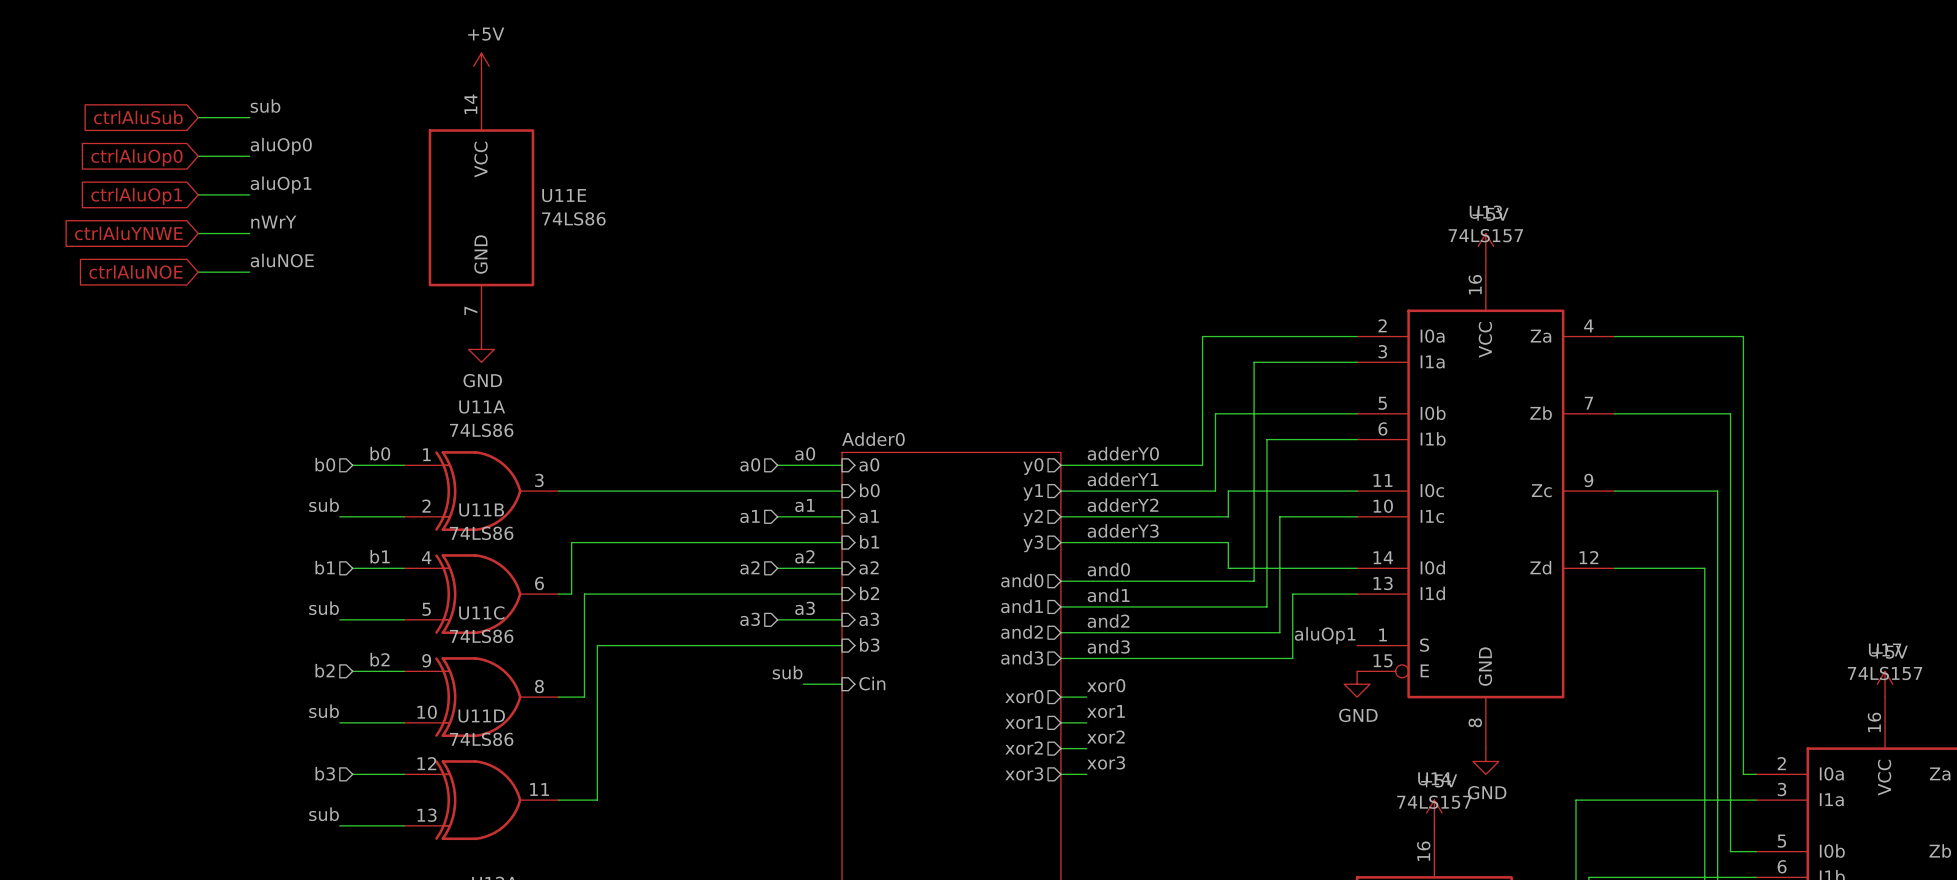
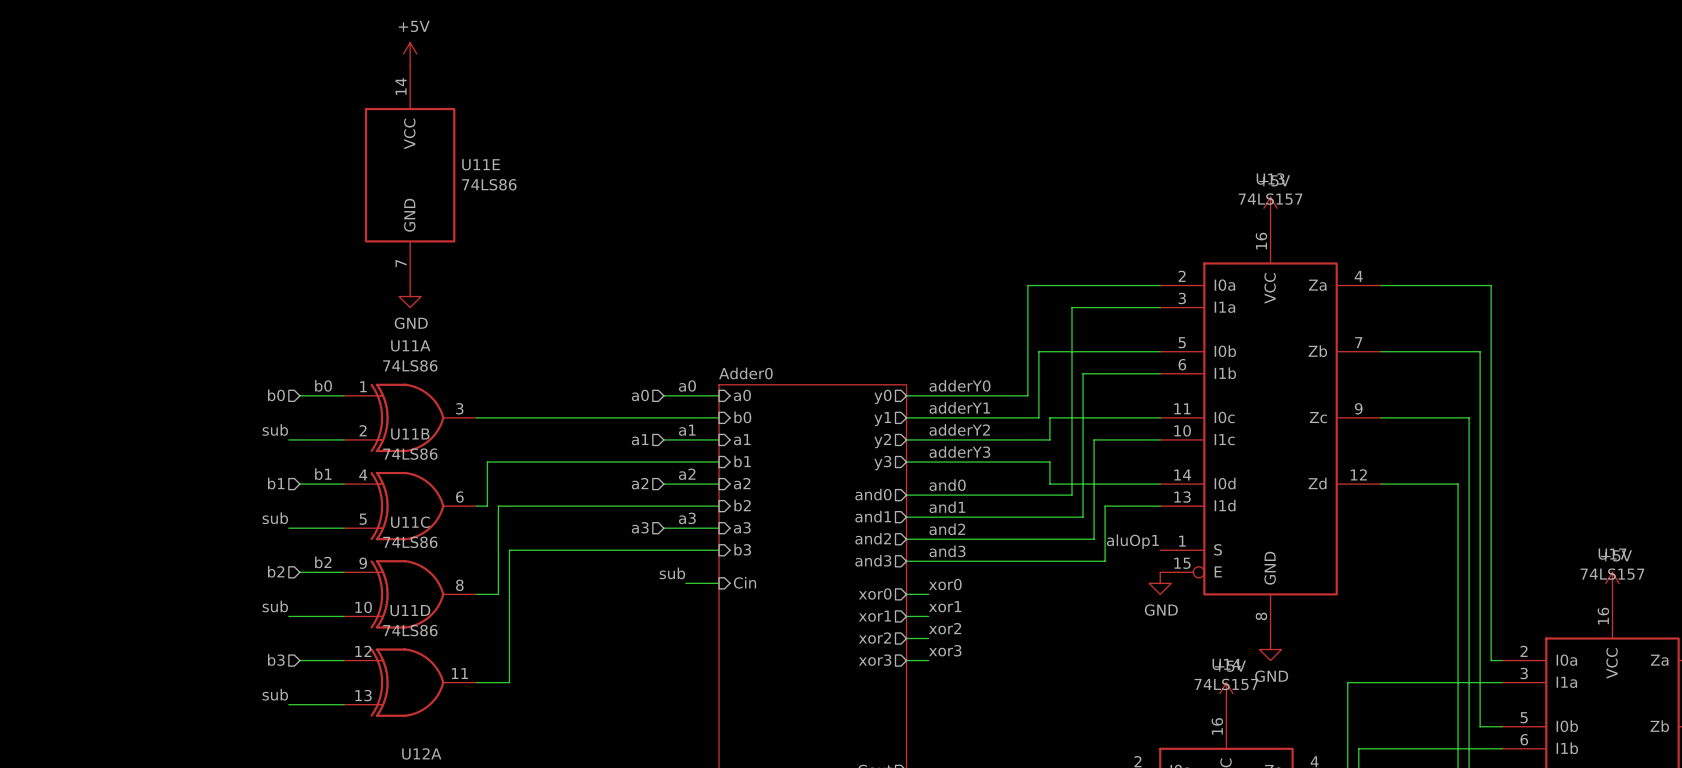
label: sub (265, 106) -> none
global label: ctrlAluSub (138, 117) -> none
wire: (198, 117) (249, 117) -> none
label: aluOp0 (281, 146) -> none
wire: (198, 156) (249, 156) -> none
global label: ctrlAluOp0 (136, 157) -> none
label: aluOp1 (281, 184) -> none
wire: (198, 194) (249, 194) -> none
global label: ctrlAluOp1 (136, 196) -> none
label: nWrY (273, 222) -> none
global label: ctrlAluYNWE (128, 233) -> none
wire: (198, 233) (249, 233) -> none
label: aluNOE (282, 260) -> none
global label: ctrlAluNOE (135, 272) -> none
wire: (198, 272) (249, 272) -> none

